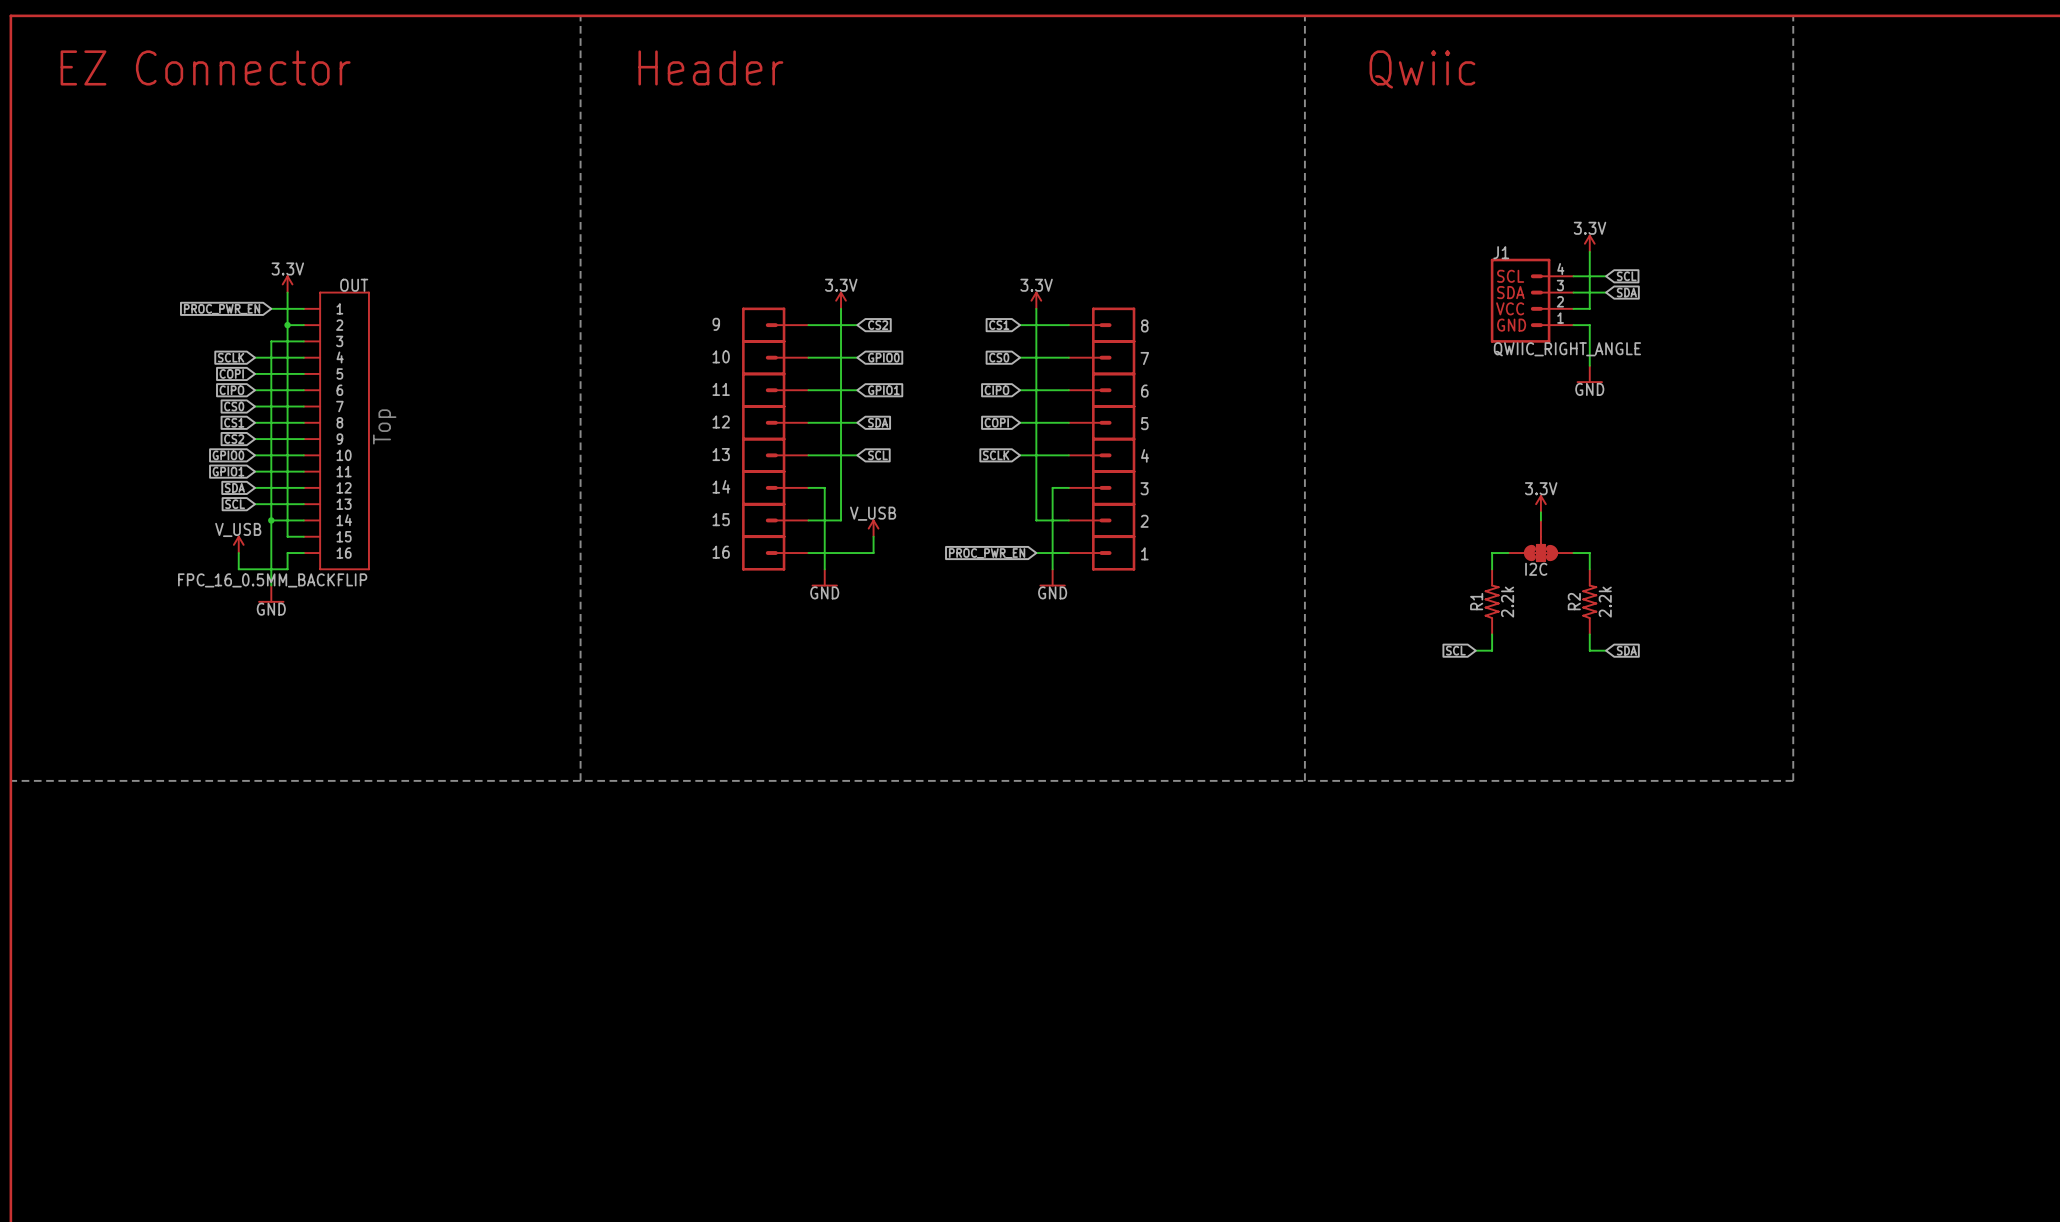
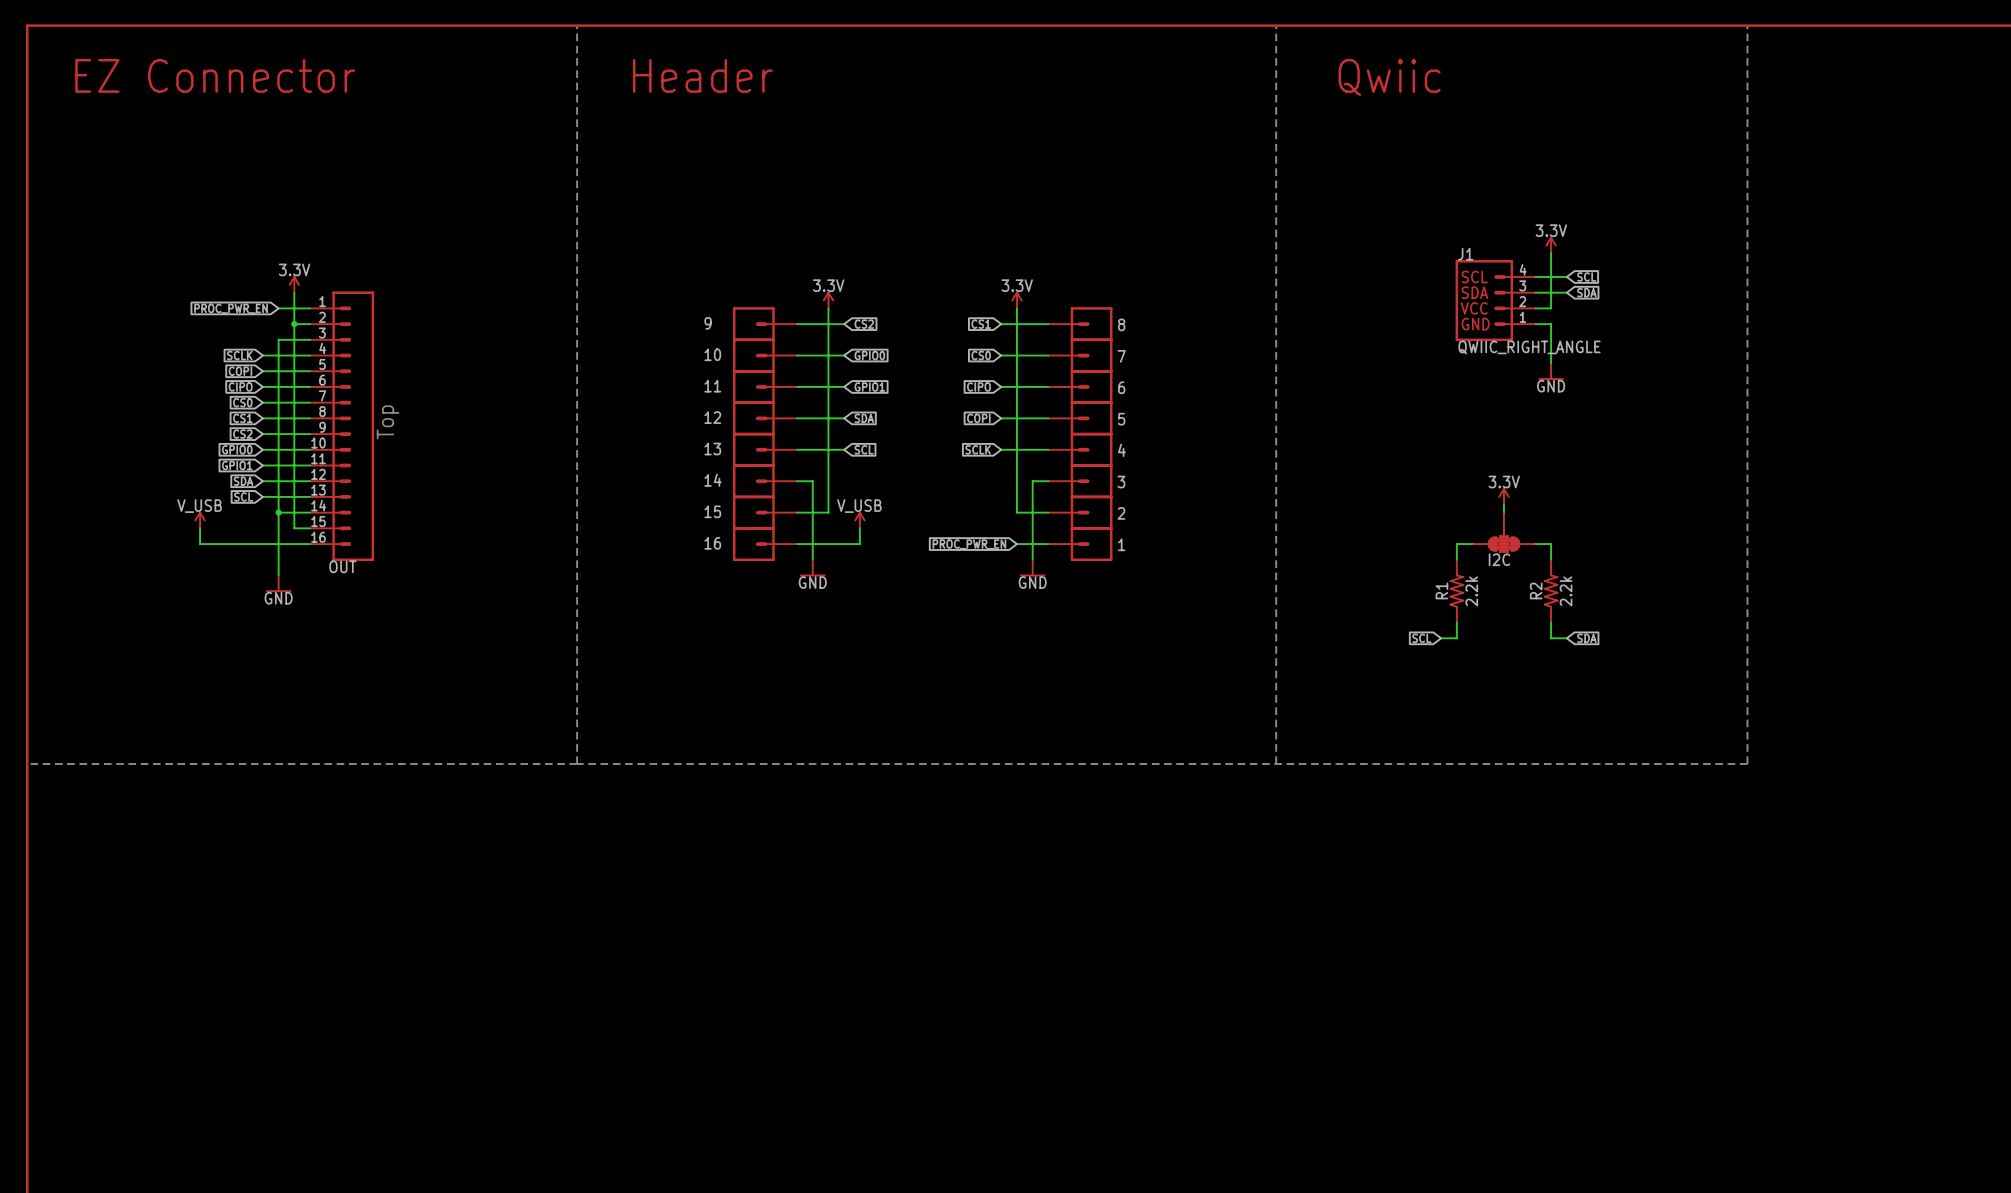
OUT name position: OUT (354, 285) -> OUT (342, 566)
OUT symbol: [303, 291, 370, 571] -> [310, 291, 375, 562]
power symbol position: V_USB (238, 544) -> V_USB (200, 520)
wire: (238, 553) (238, 569) (287, 569) (287, 553) -> (200, 528) (200, 544) (294, 544)
OUT value: FPC_16_0.5MM_BACKFLIP (272, 580) -> none

